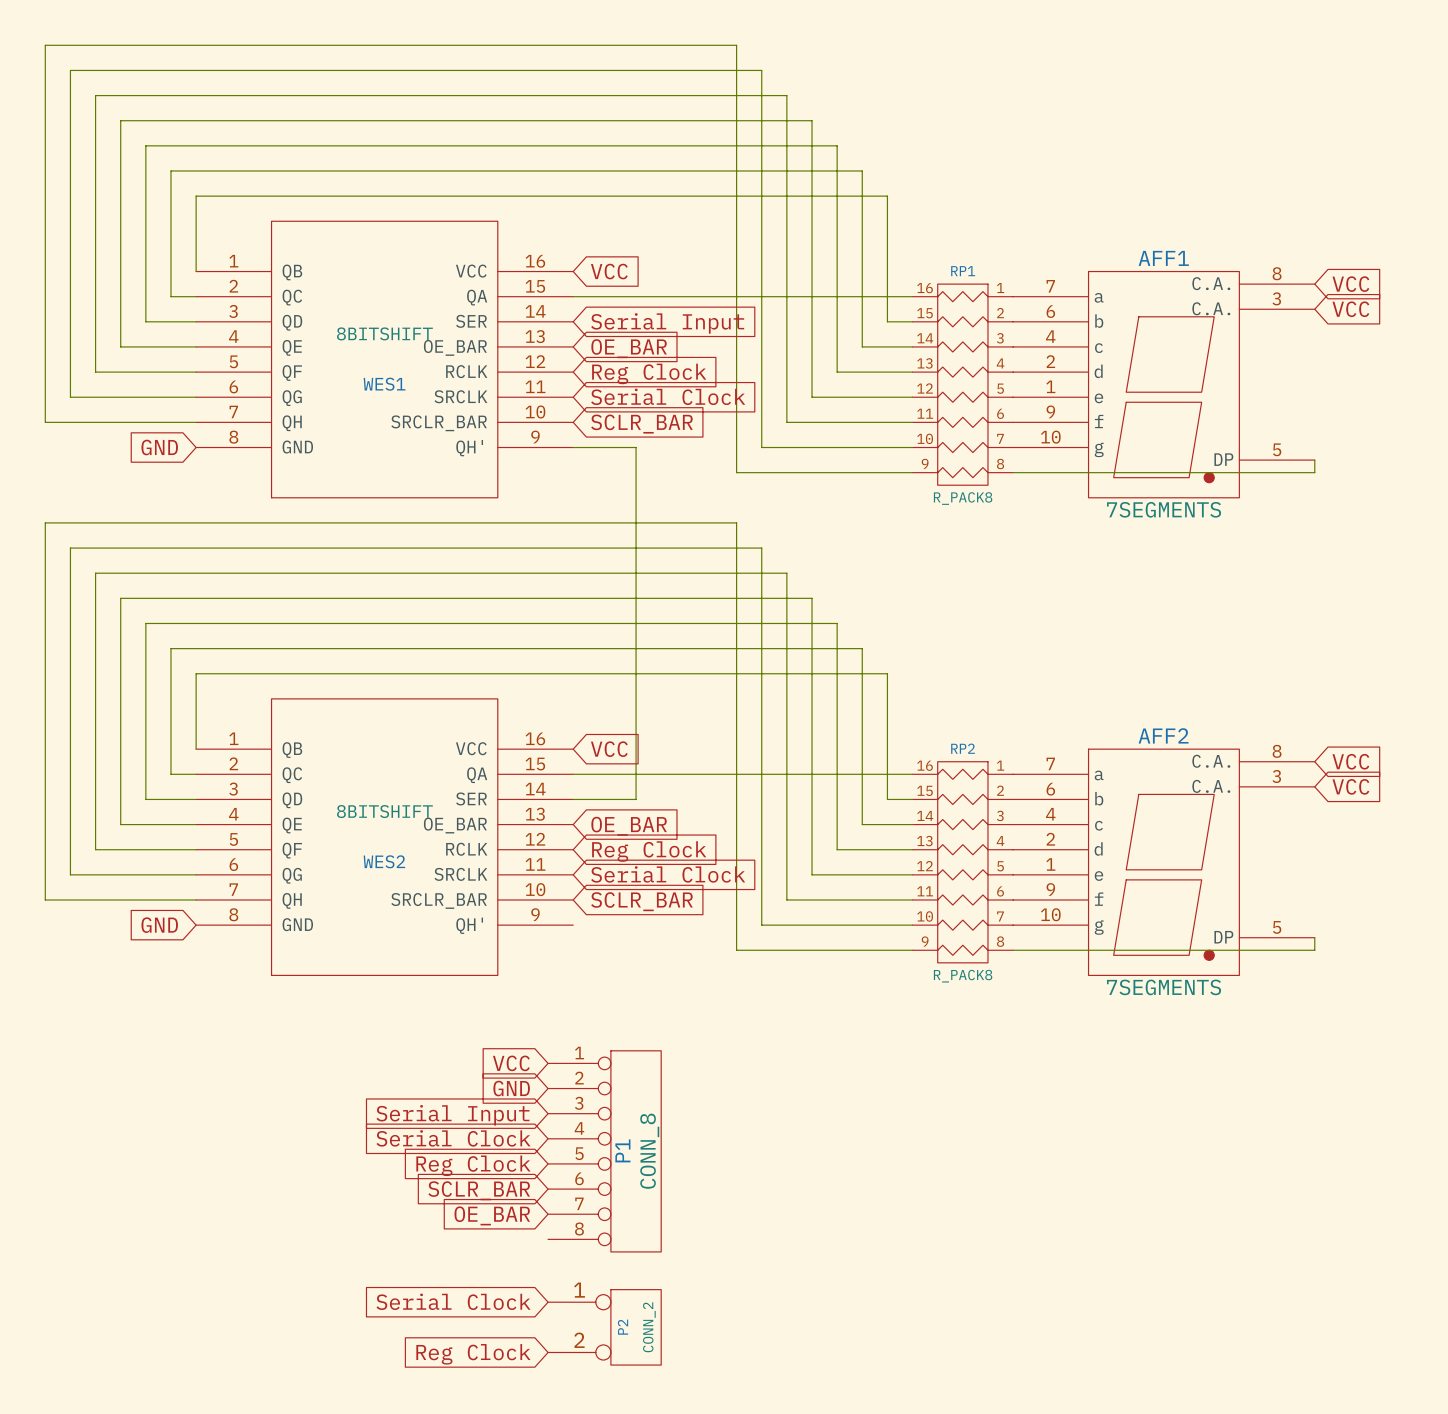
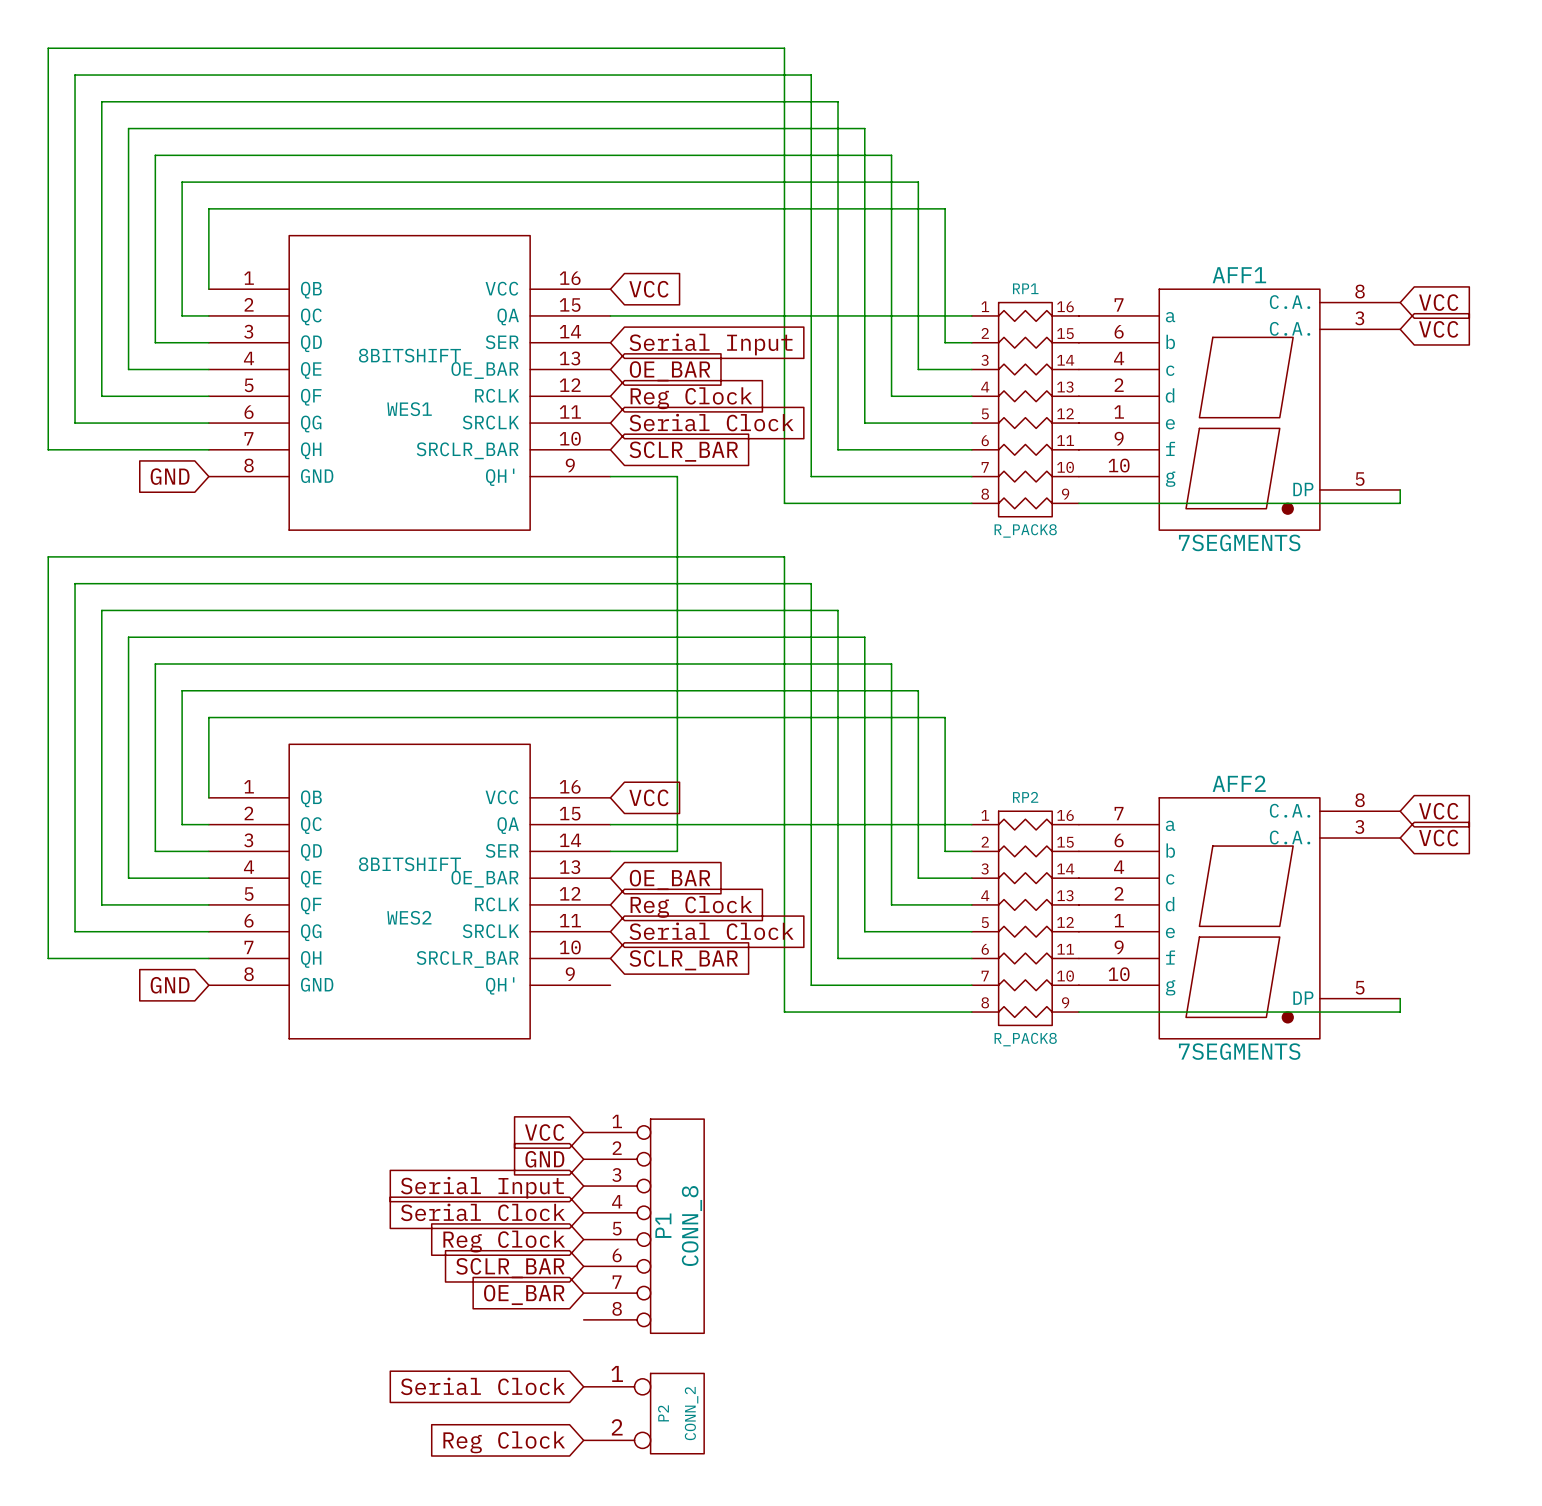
RP1 flip: as is (962, 384) -> left-right (1025, 409)
RP2 flip: as is (962, 862) -> left-right (1025, 918)

